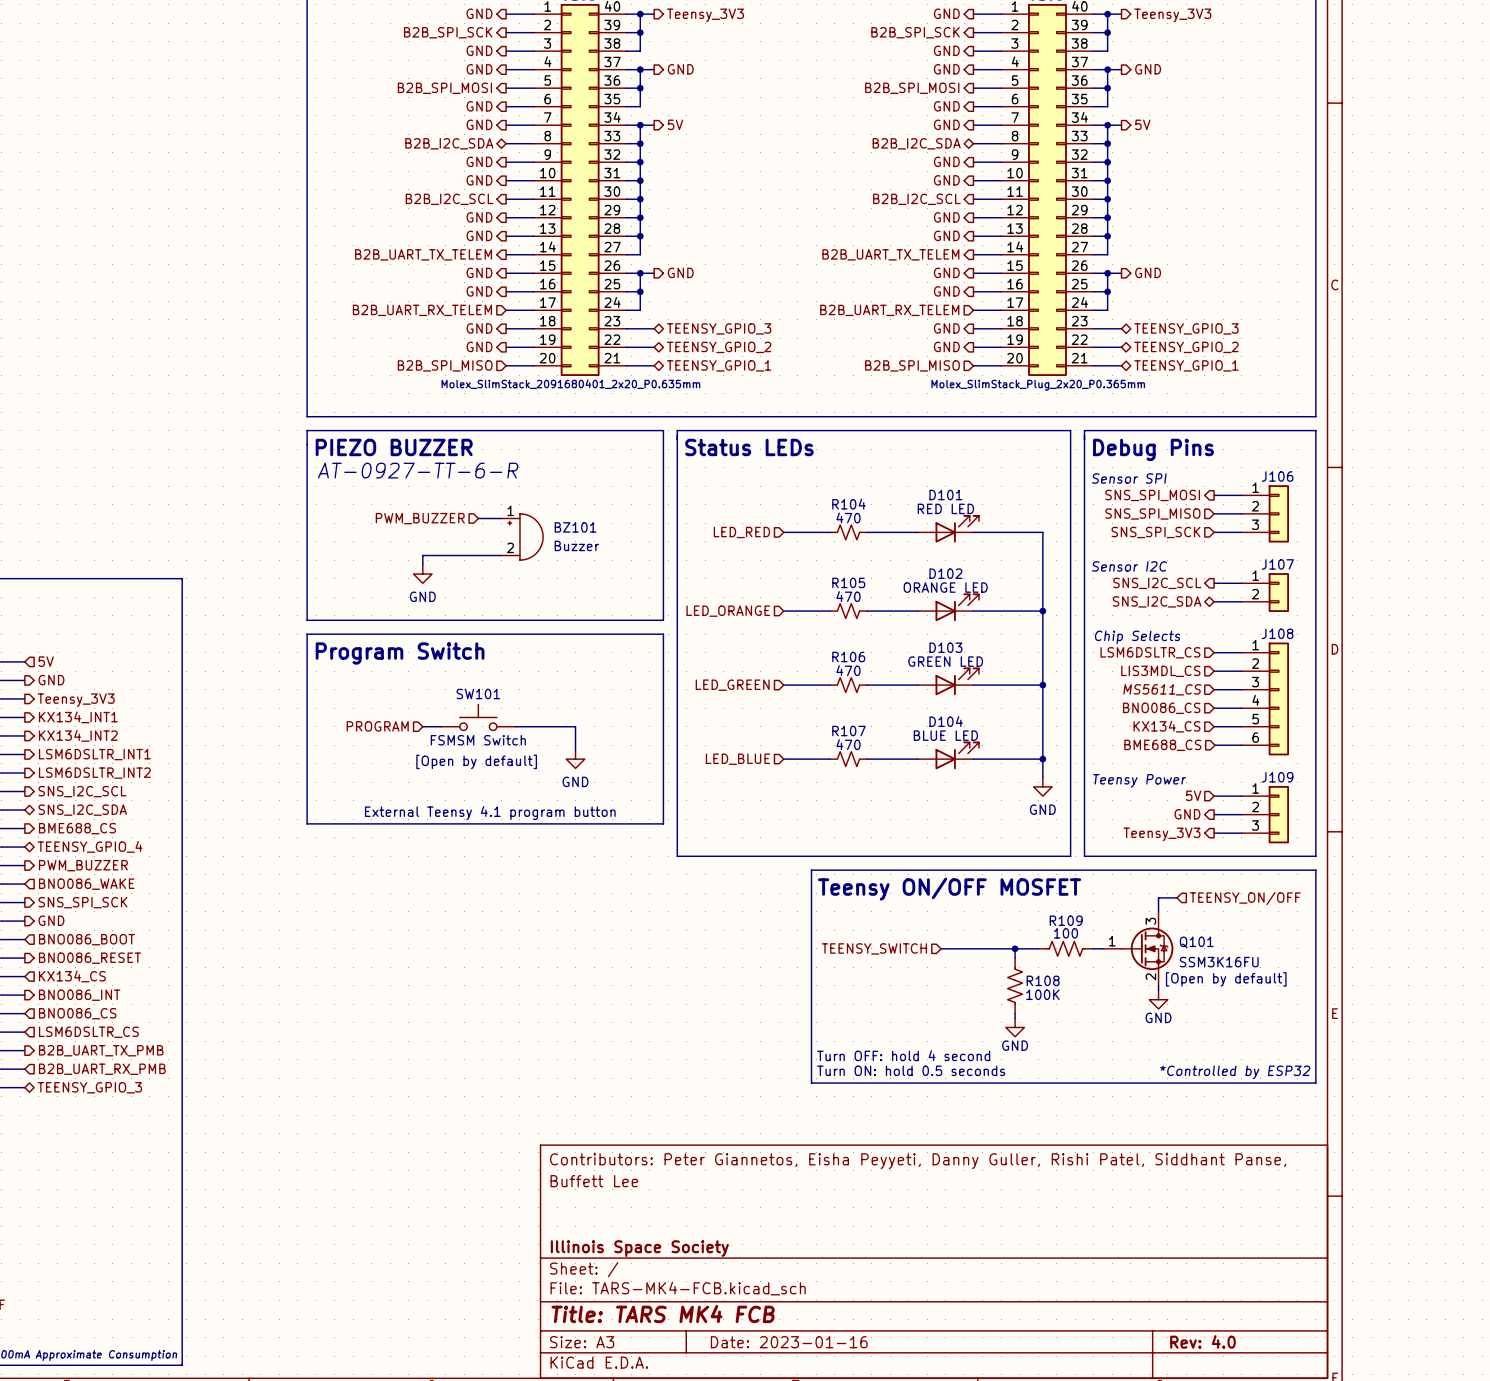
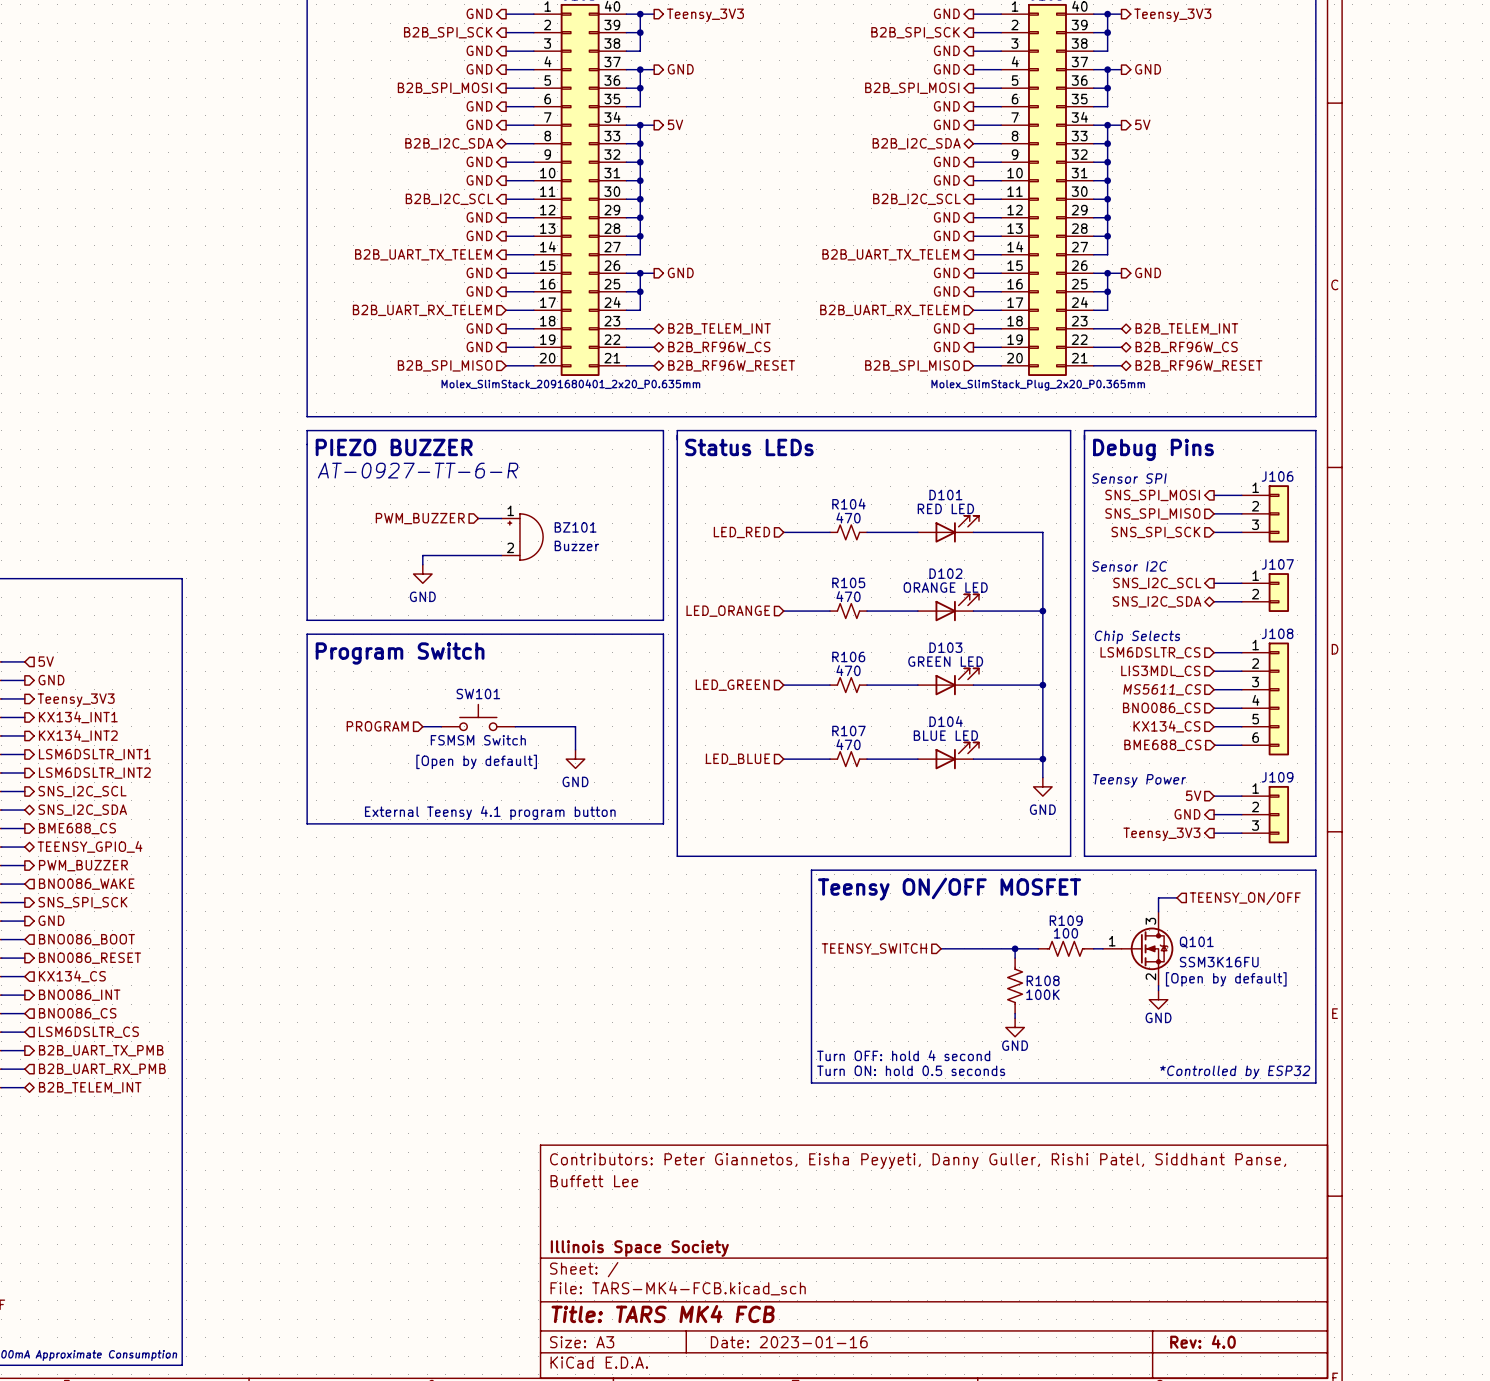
hierarchical label: TEENSY_GPIO_3 (719, 328) -> B2B_TELEM_INT (719, 328)
hierarchical label: TEENSY_GPIO_3 (1186, 328) -> B2B_TELEM_INT (1186, 328)
hierarchical label: TEENSY_GPIO_2 (719, 347) -> B2B_RF96W_CS (719, 347)
hierarchical label: TEENSY_GPIO_2 (1186, 347) -> B2B_RF96W_CS (1186, 347)
hierarchical label: TEENSY_GPIO_1 (719, 365) -> B2B_RF96W_RESET (731, 365)
hierarchical label: TEENSY_GPIO_1 (1186, 365) -> B2B_RF96W_RESET (1199, 365)
hierarchical label: TEENSY_GPIO_3 (89, 1087) -> B2B_TELEM_INT (90, 1087)

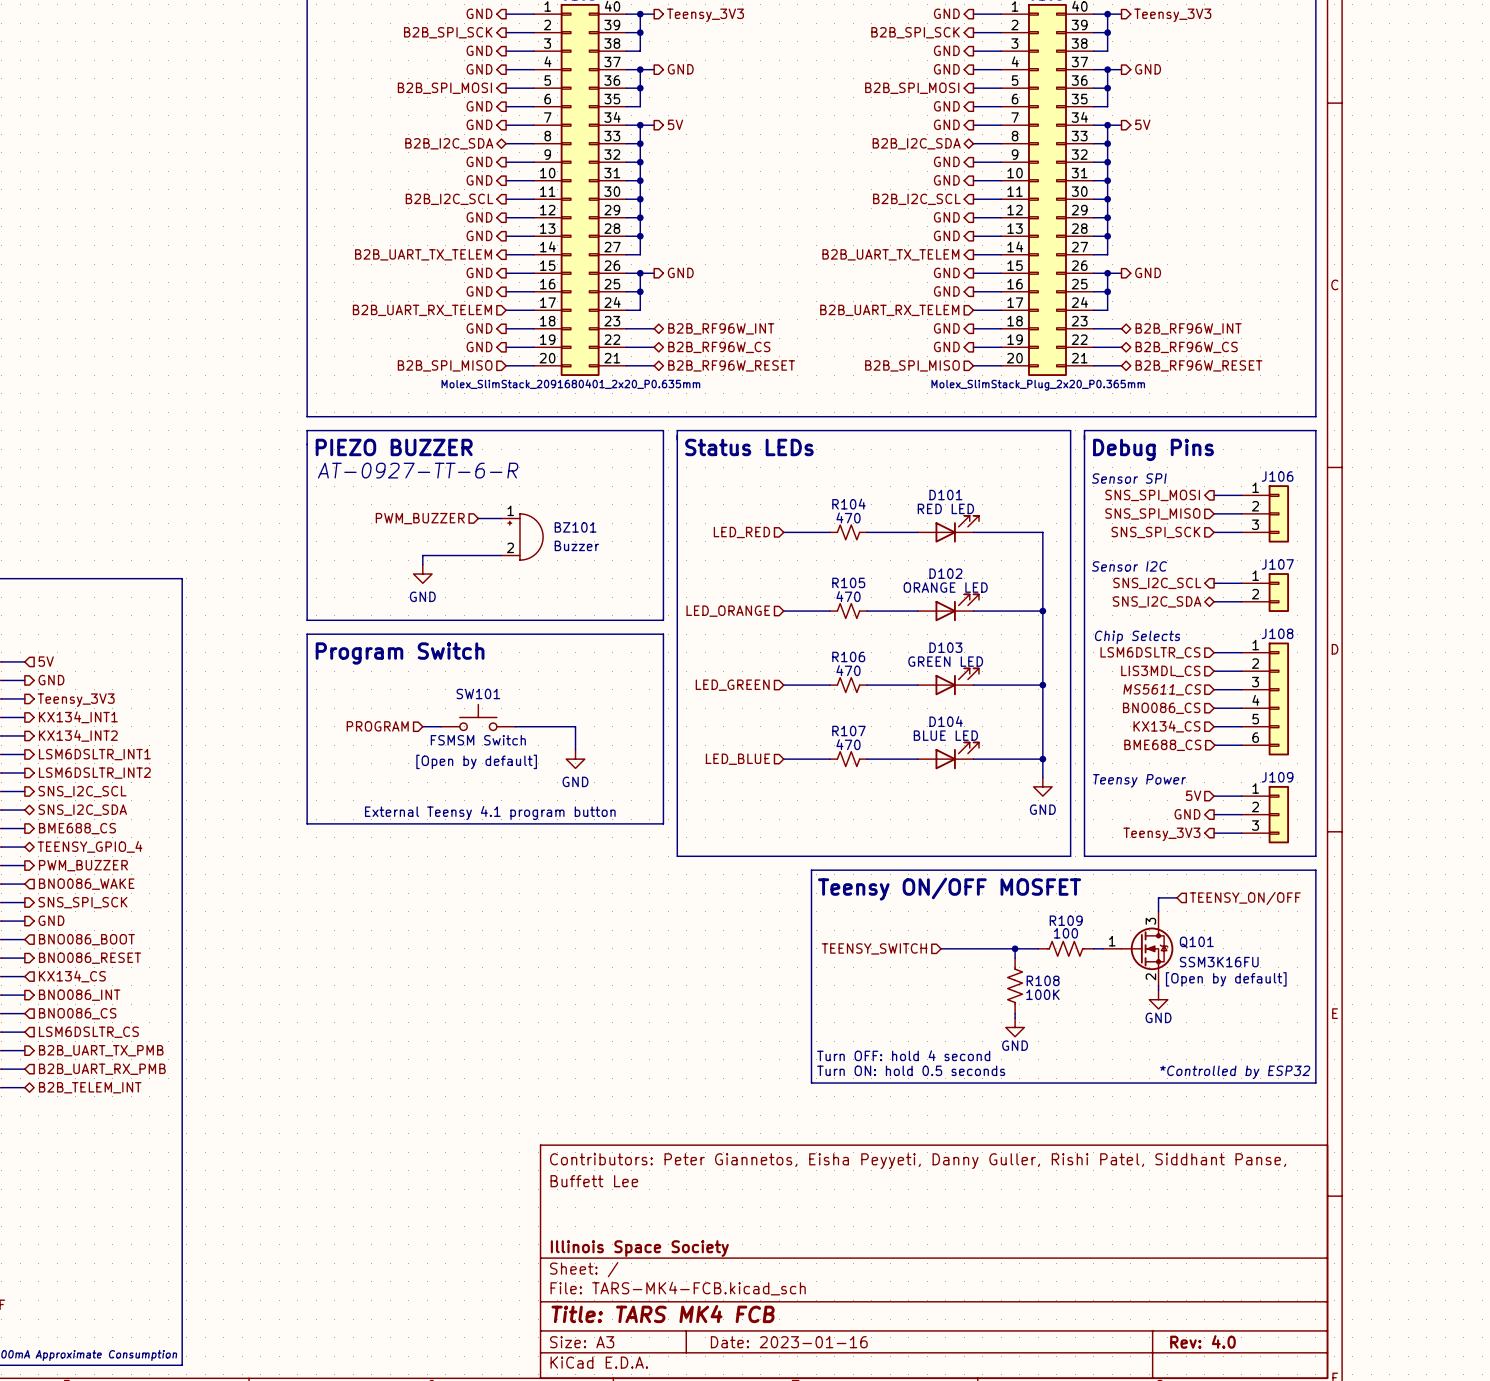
hierarchical label: B2B_TELEM_INT (719, 328) -> B2B_RF96W_INT (721, 328)
hierarchical label: B2B_TELEM_INT (1186, 328) -> B2B_RF96W_INT (1188, 328)

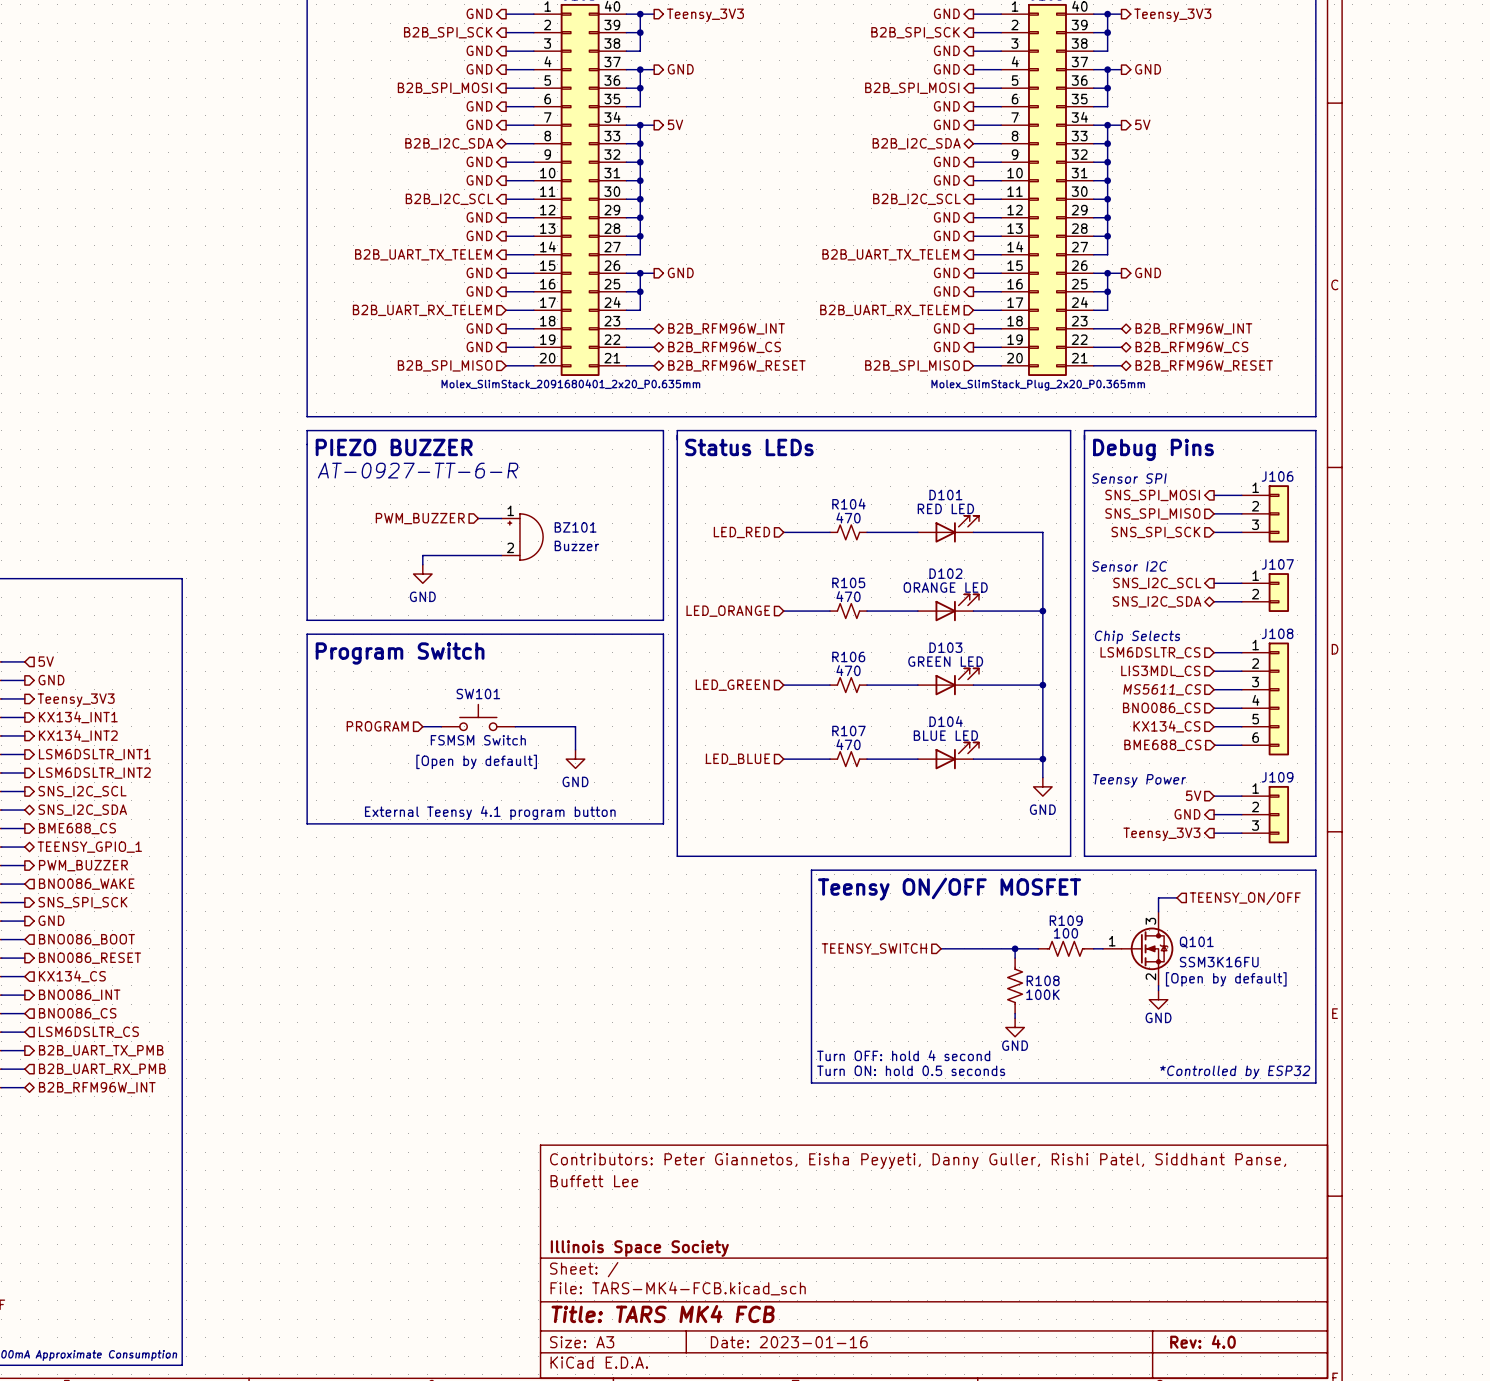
hierarchical label: B2B_RF96W_INT (721, 328) -> B2B_RFM96W_INT (726, 328)
hierarchical label: B2B_RF96W_INT (1188, 328) -> B2B_RFM96W_INT (1193, 328)
hierarchical label: B2B_RF96W_CS (719, 347) -> B2B_RFM96W_CS (724, 347)
hierarchical label: B2B_RF96W_CS (1186, 347) -> B2B_RFM96W_CS (1191, 347)
hierarchical label: B2B_RF96W_RESET (731, 365) -> B2B_RFM96W_RESET (736, 365)
hierarchical label: B2B_RF96W_RESET (1199, 365) -> B2B_RFM96W_RESET (1204, 365)
hierarchical label: TEENSY_GPIO_4 (90, 846) -> TEENSY_GPIO_1 (89, 847)
hierarchical label: B2B_TELEM_INT (90, 1087) -> B2B_RFM96W_INT (97, 1087)

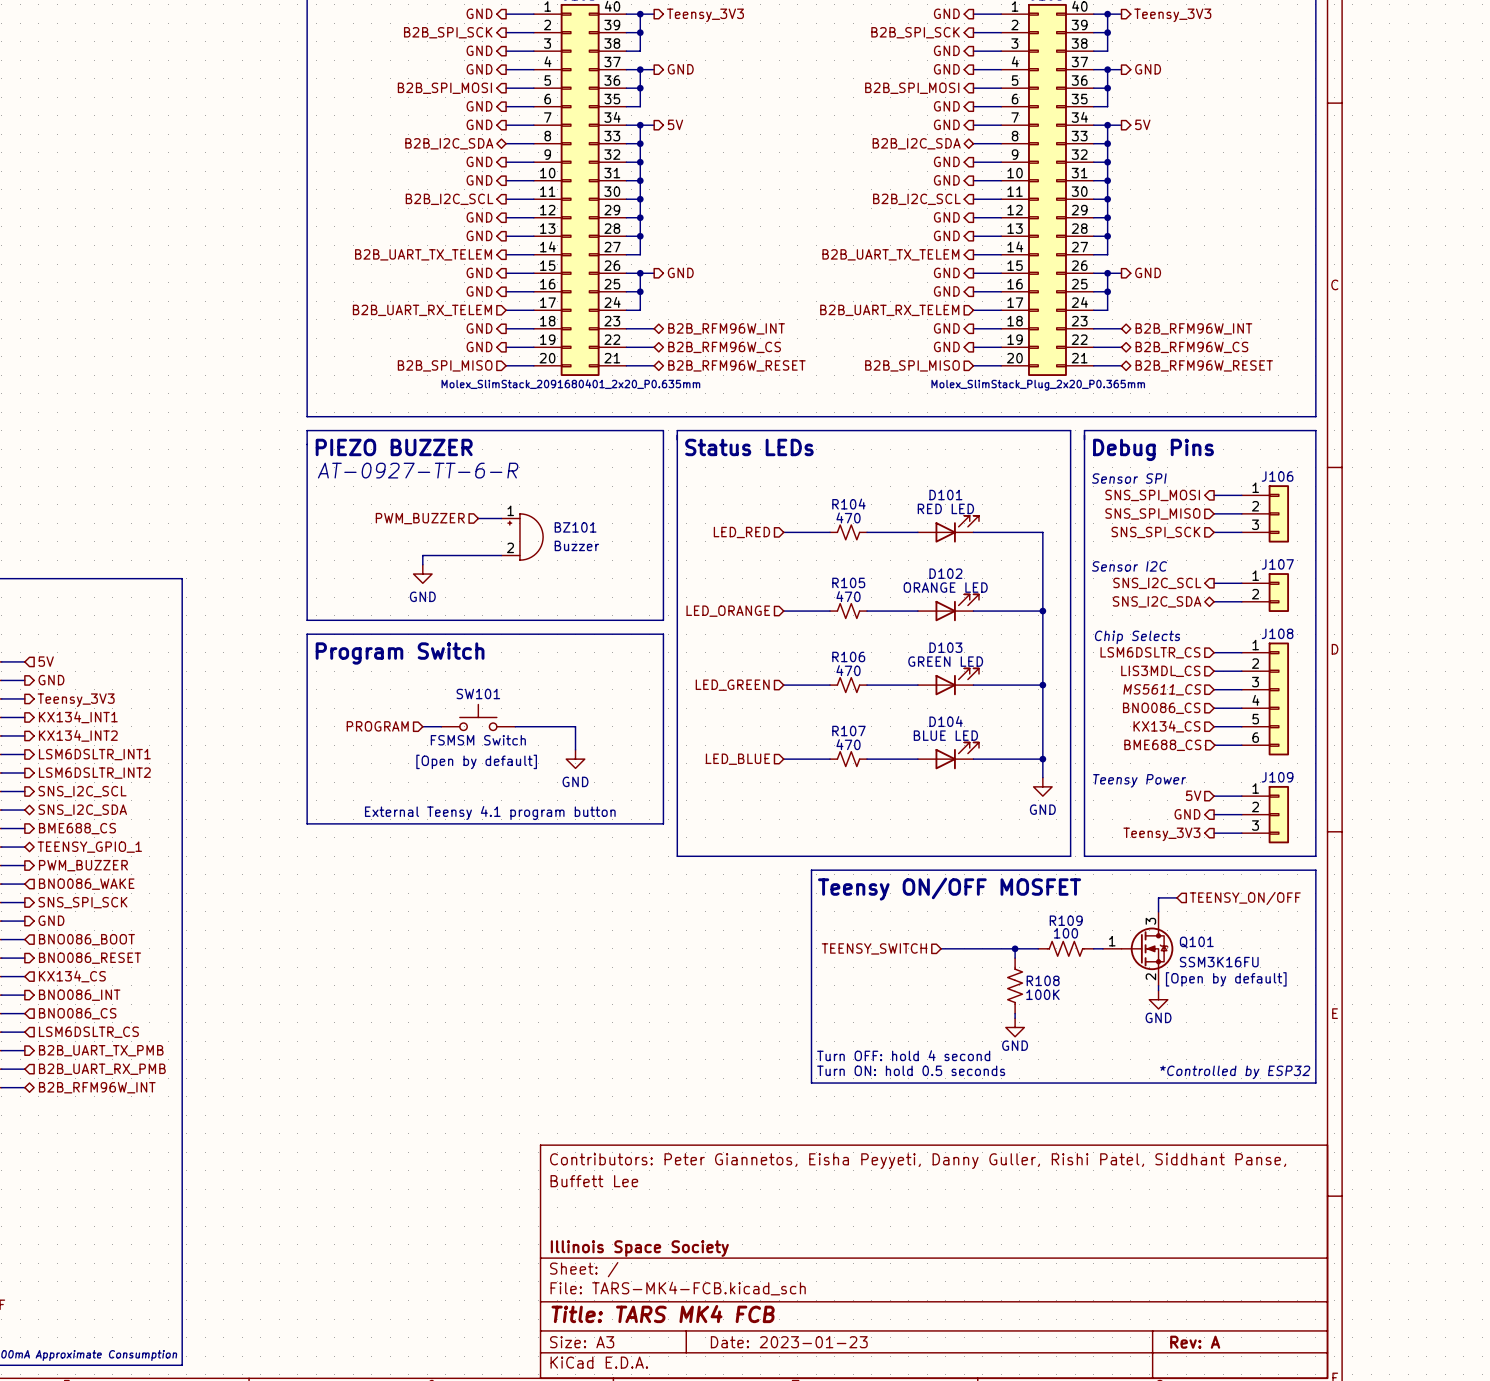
title block: Rev: 4.0 (1202, 1341) -> Rev: A (1195, 1342)
title block: Date: 2023-01-16 (789, 1342) -> Date: 2023-01-23 (789, 1342)

